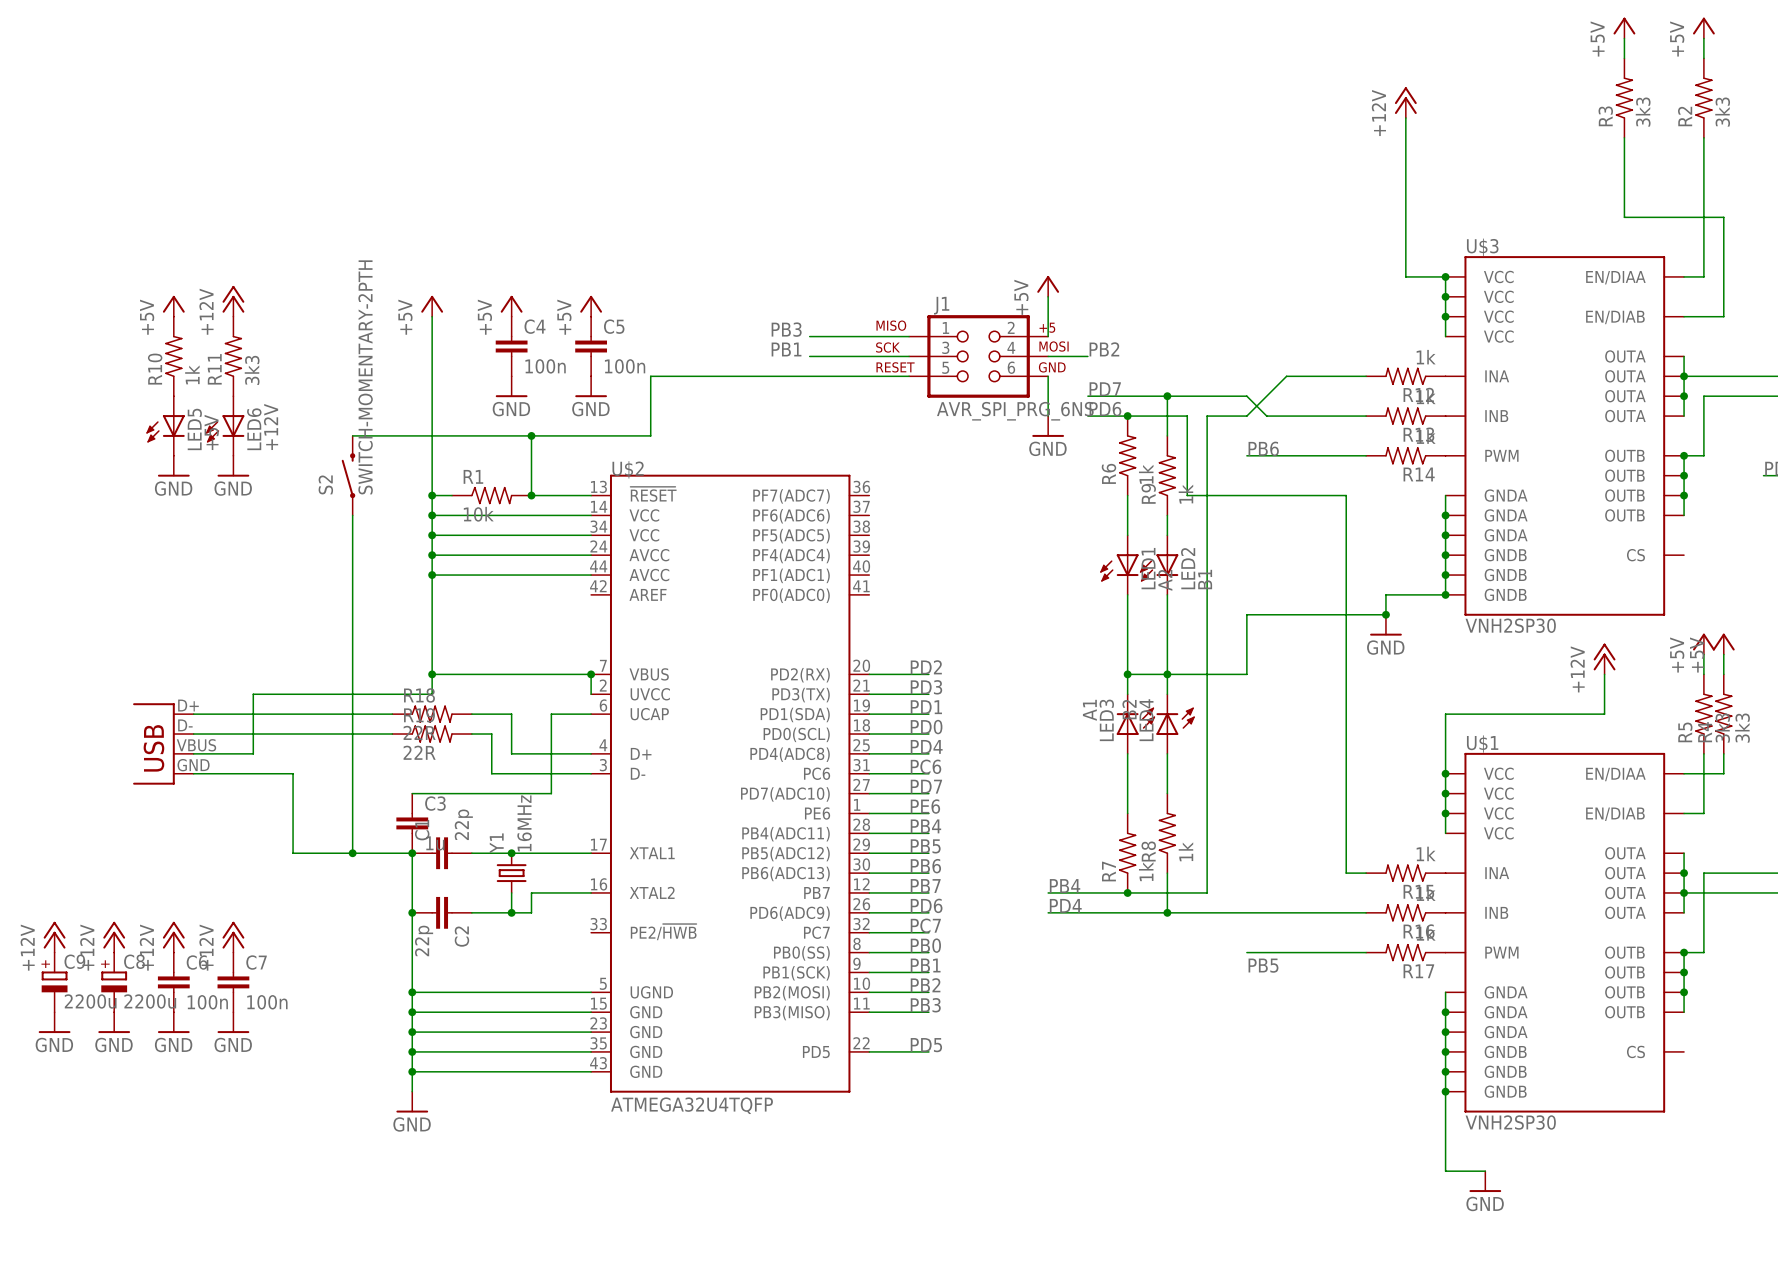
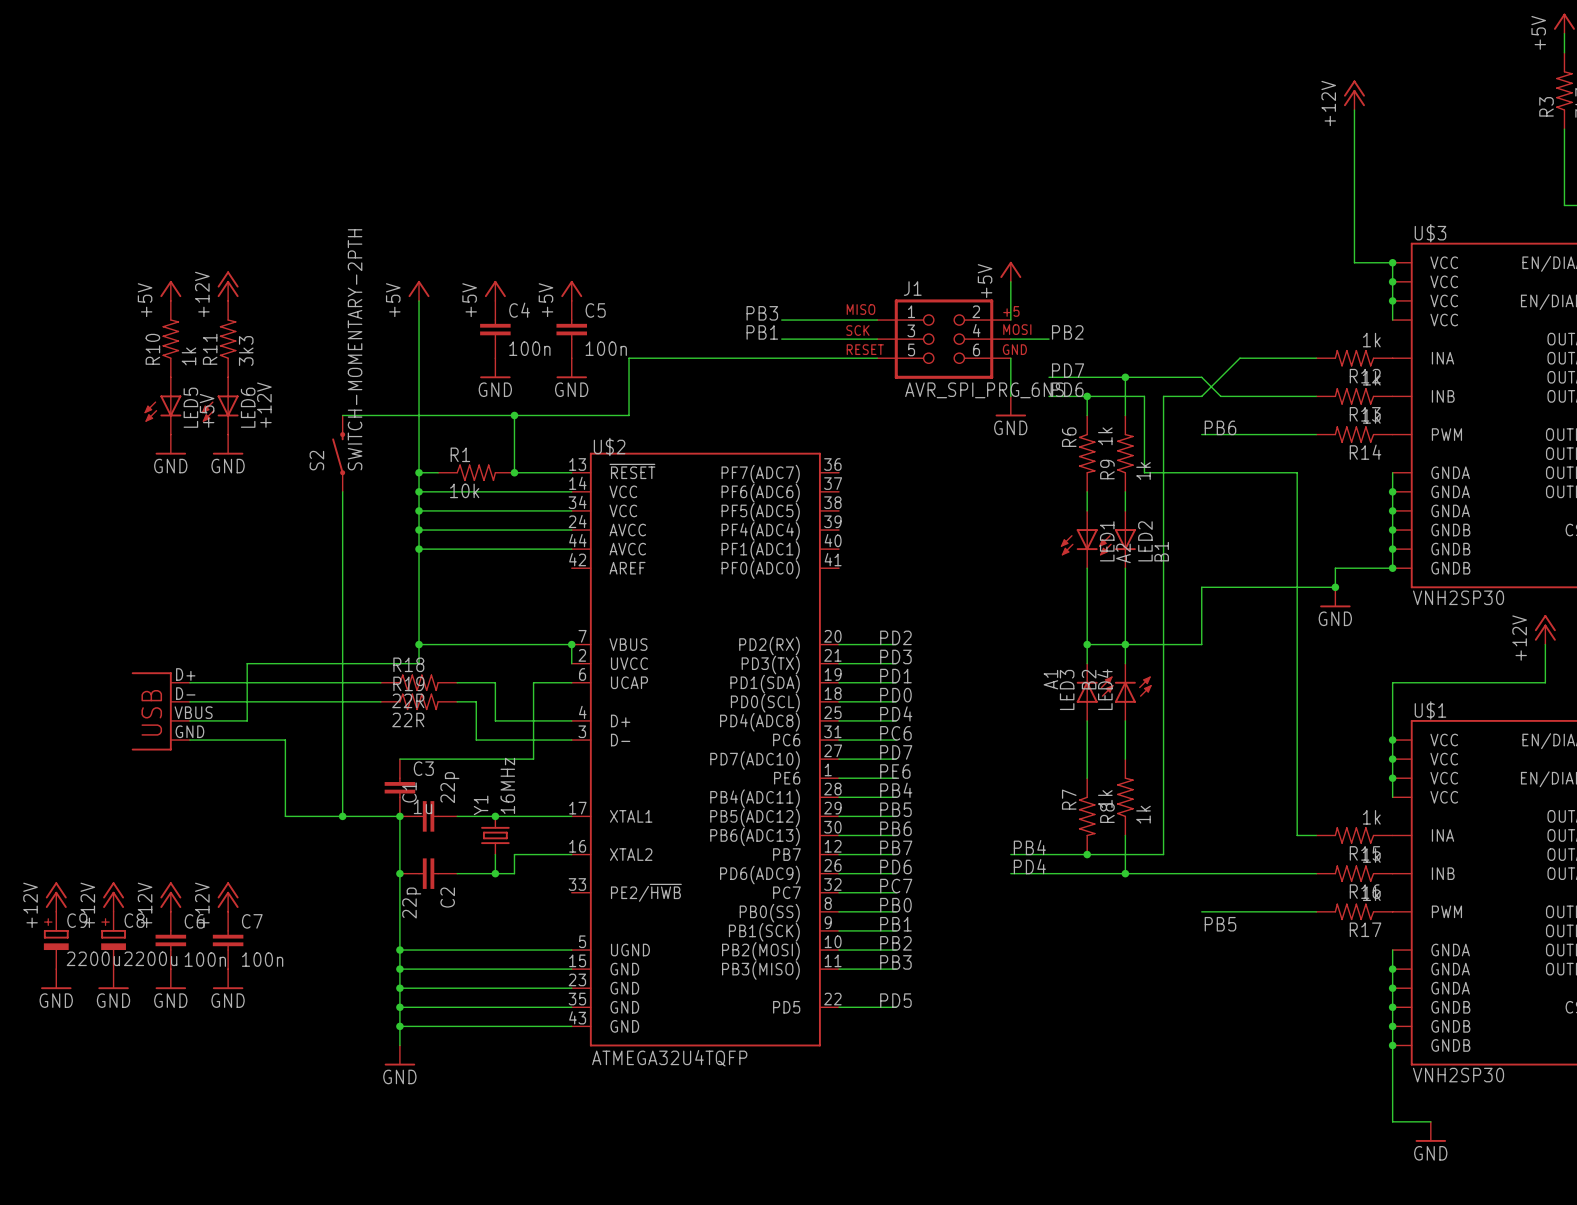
R6 flip: as is (1127, 455) -> up-down (1087, 453)
R7 flip: as is (1127, 853) -> up-down (1087, 816)

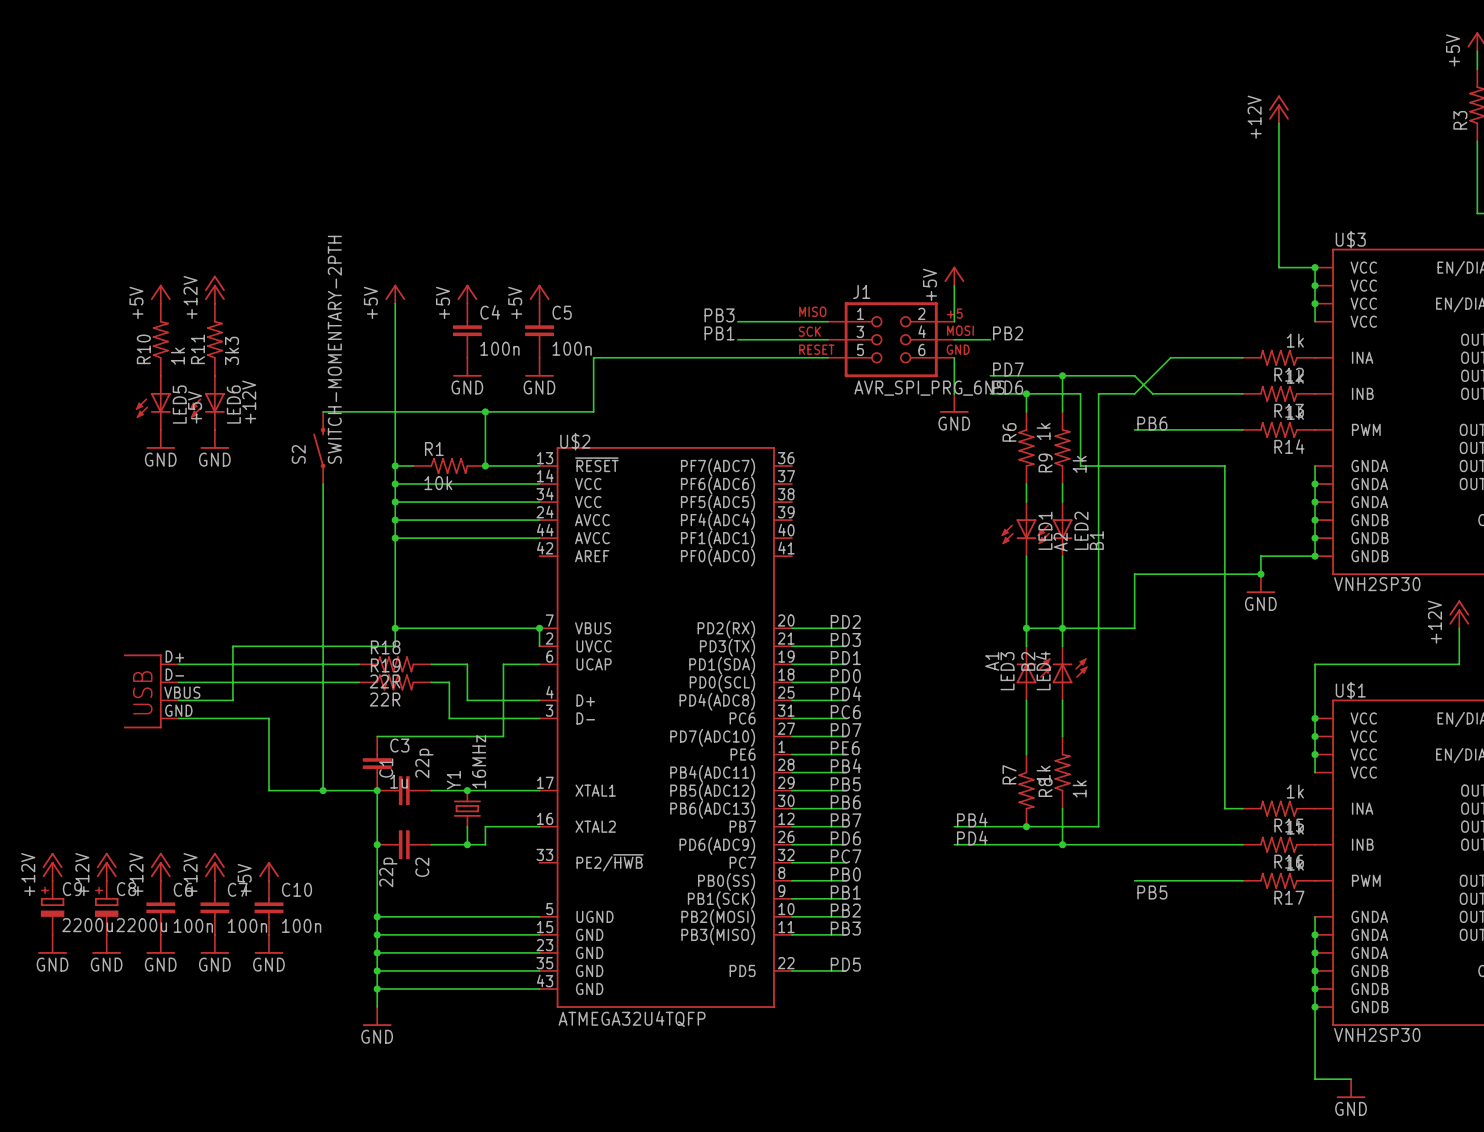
power symbol: none -> +5V (269, 871)
C10: none -> 100n (269, 907)
power symbol: none -> GND (269, 944)

